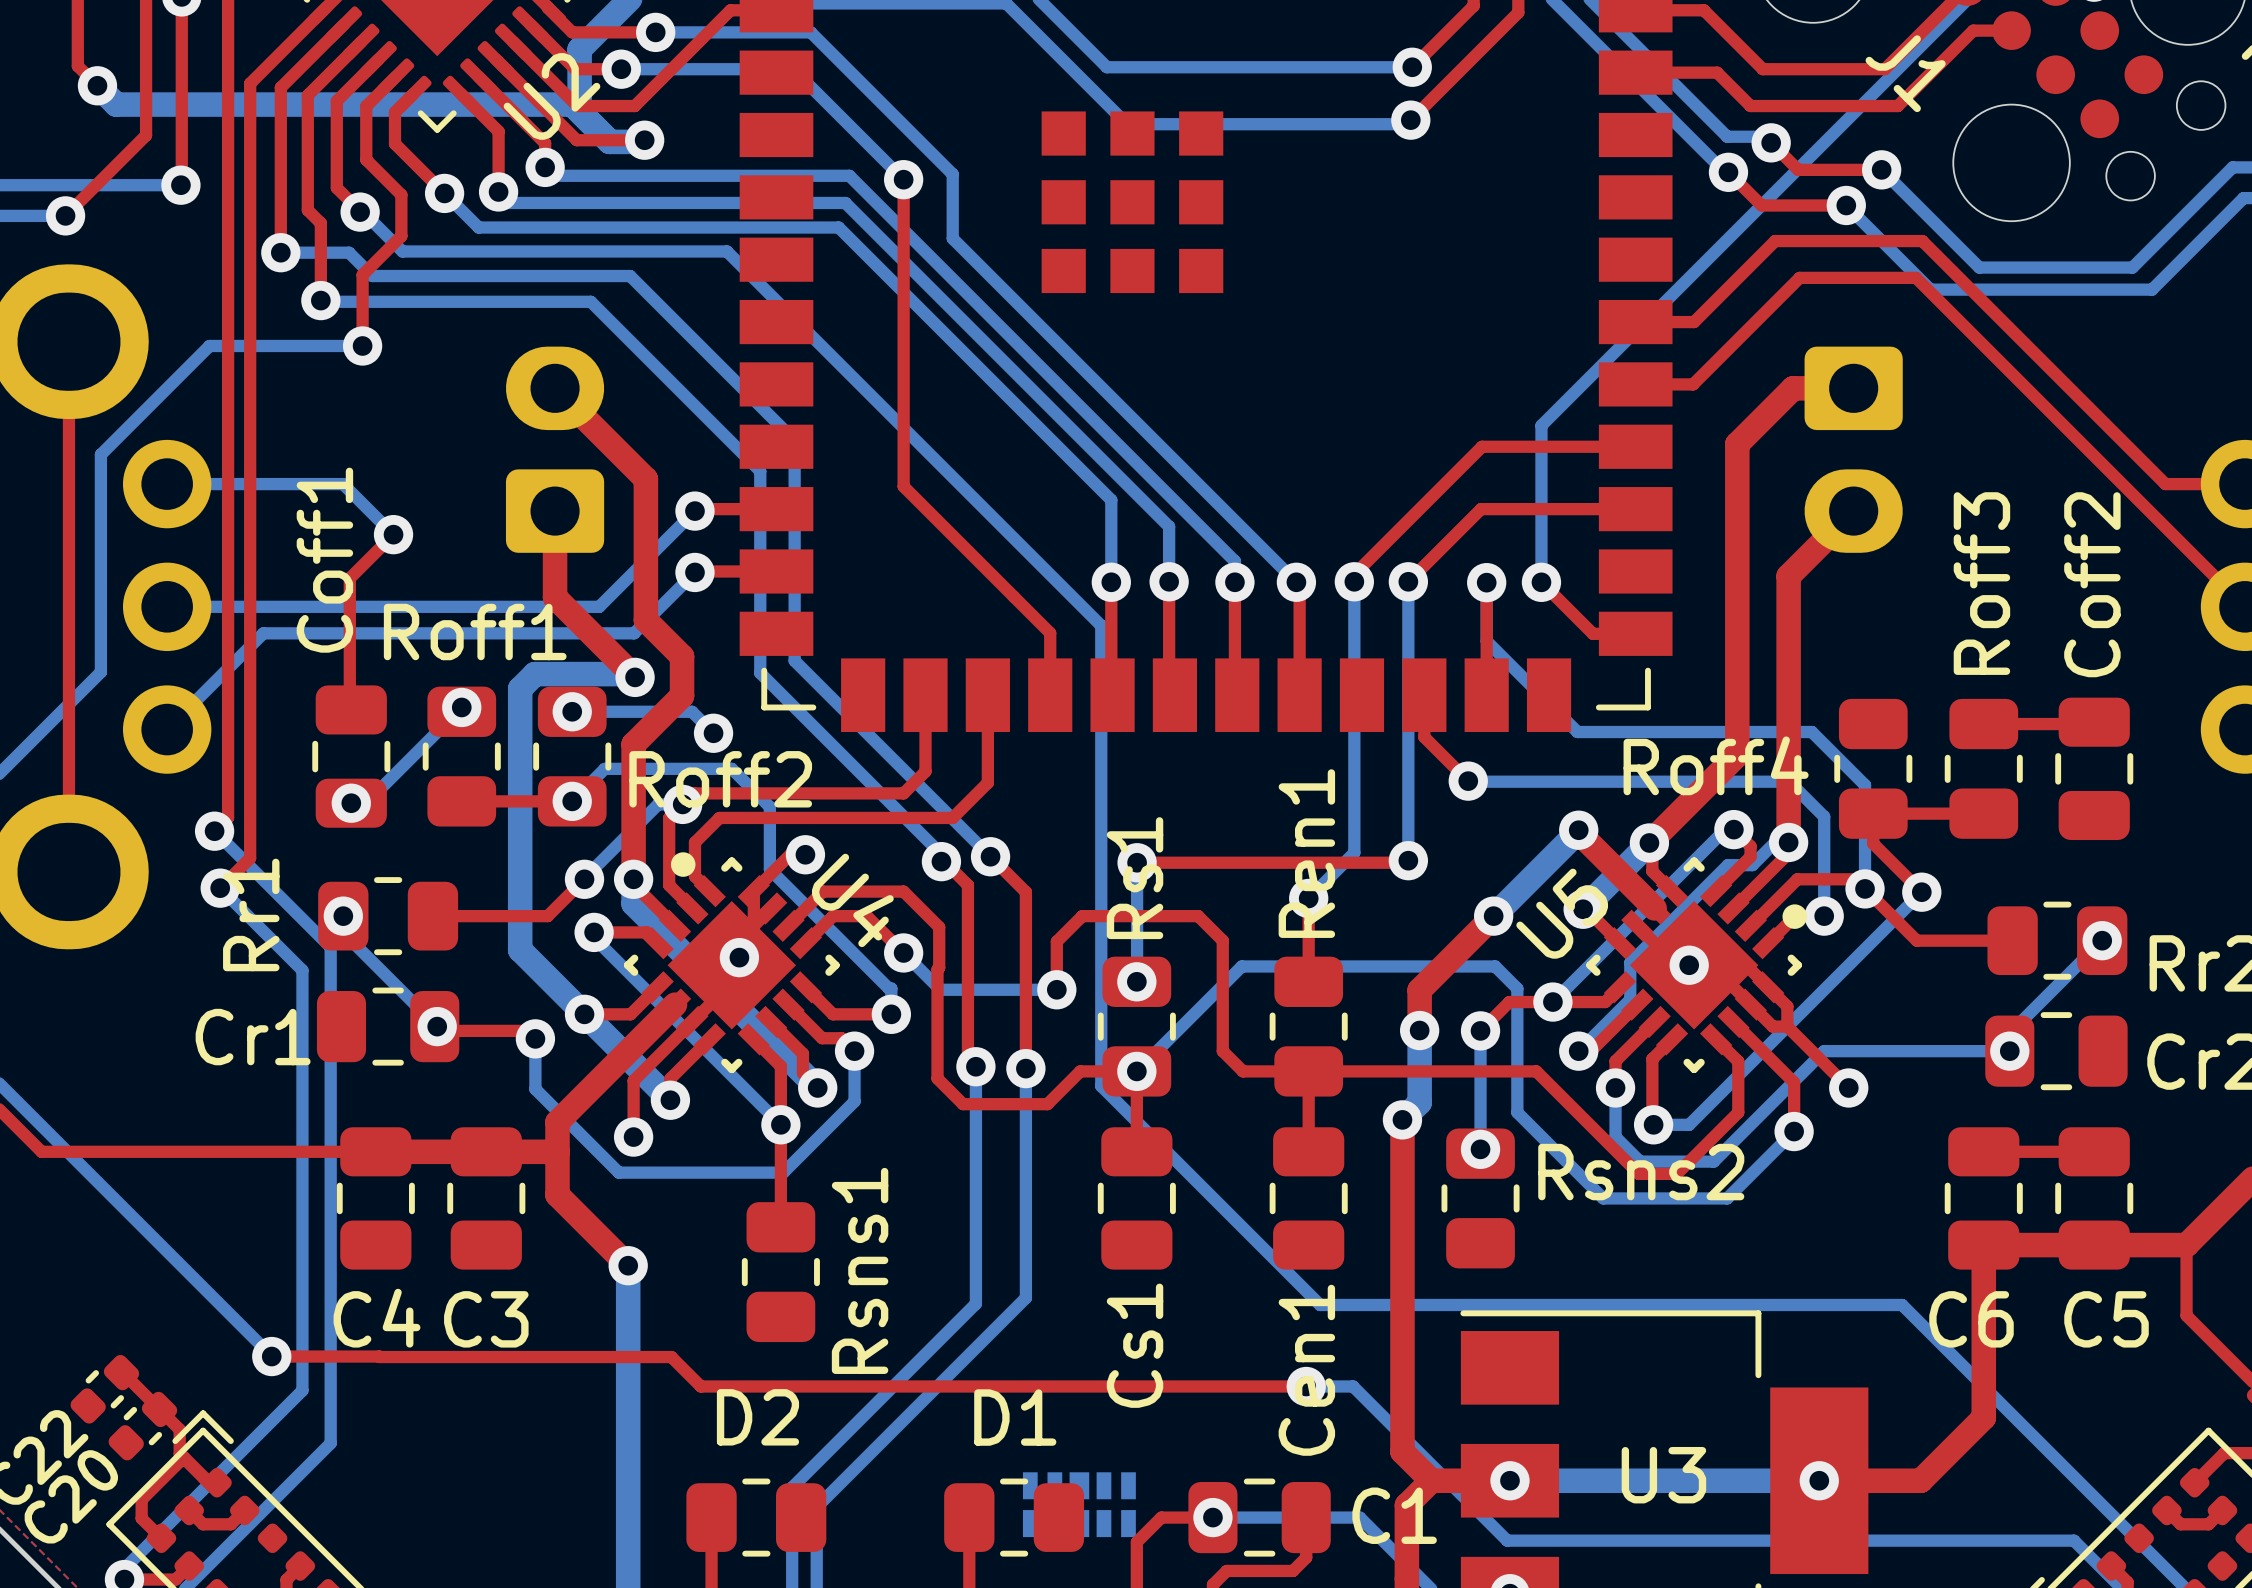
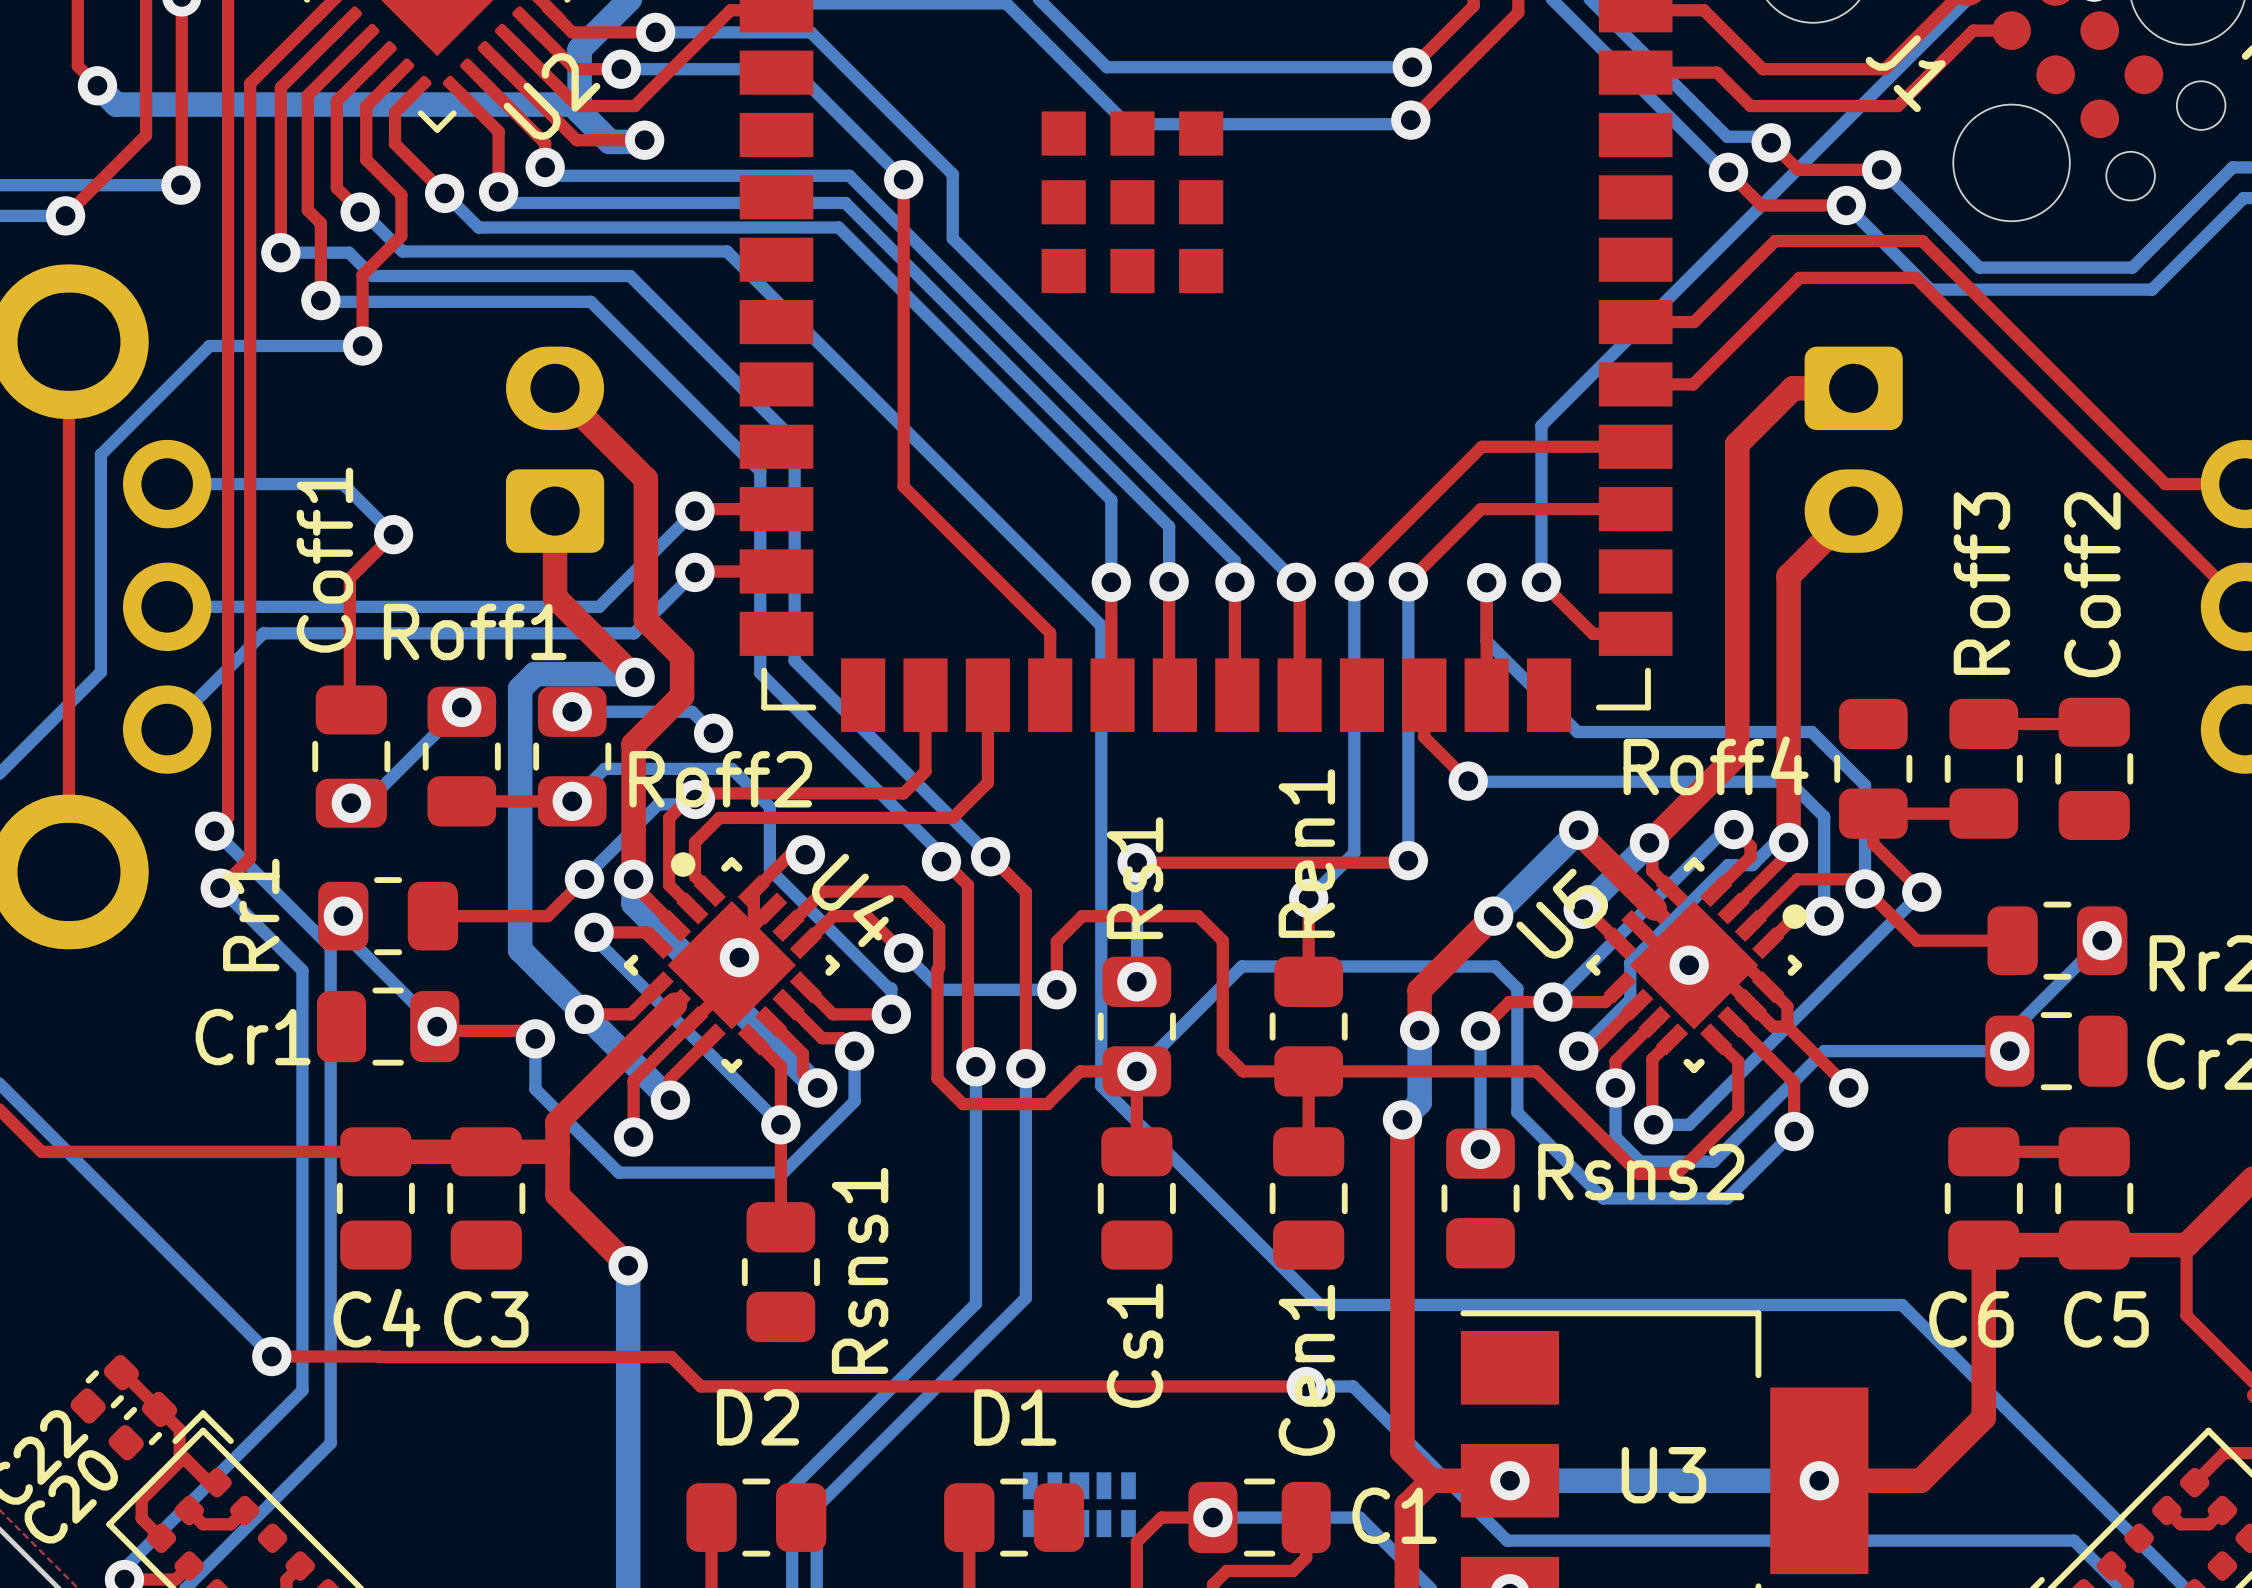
via position: (682, 804) -> (695, 799)

